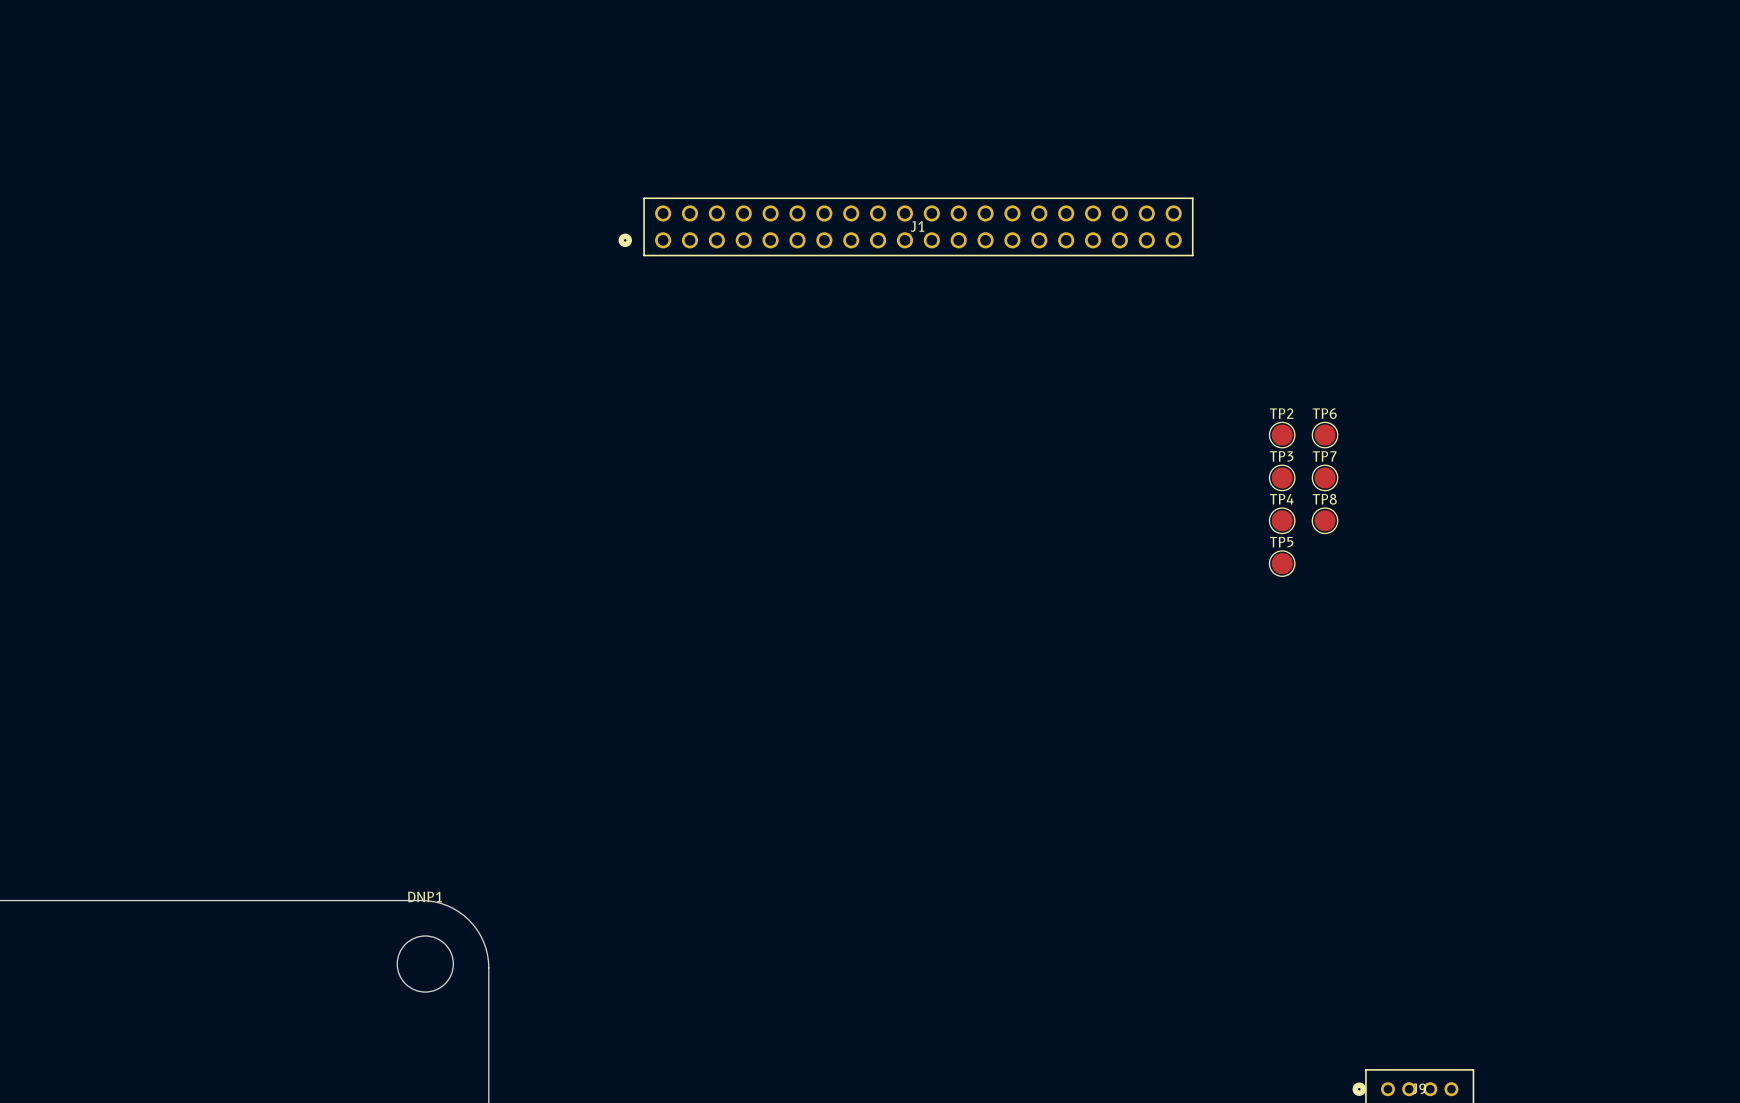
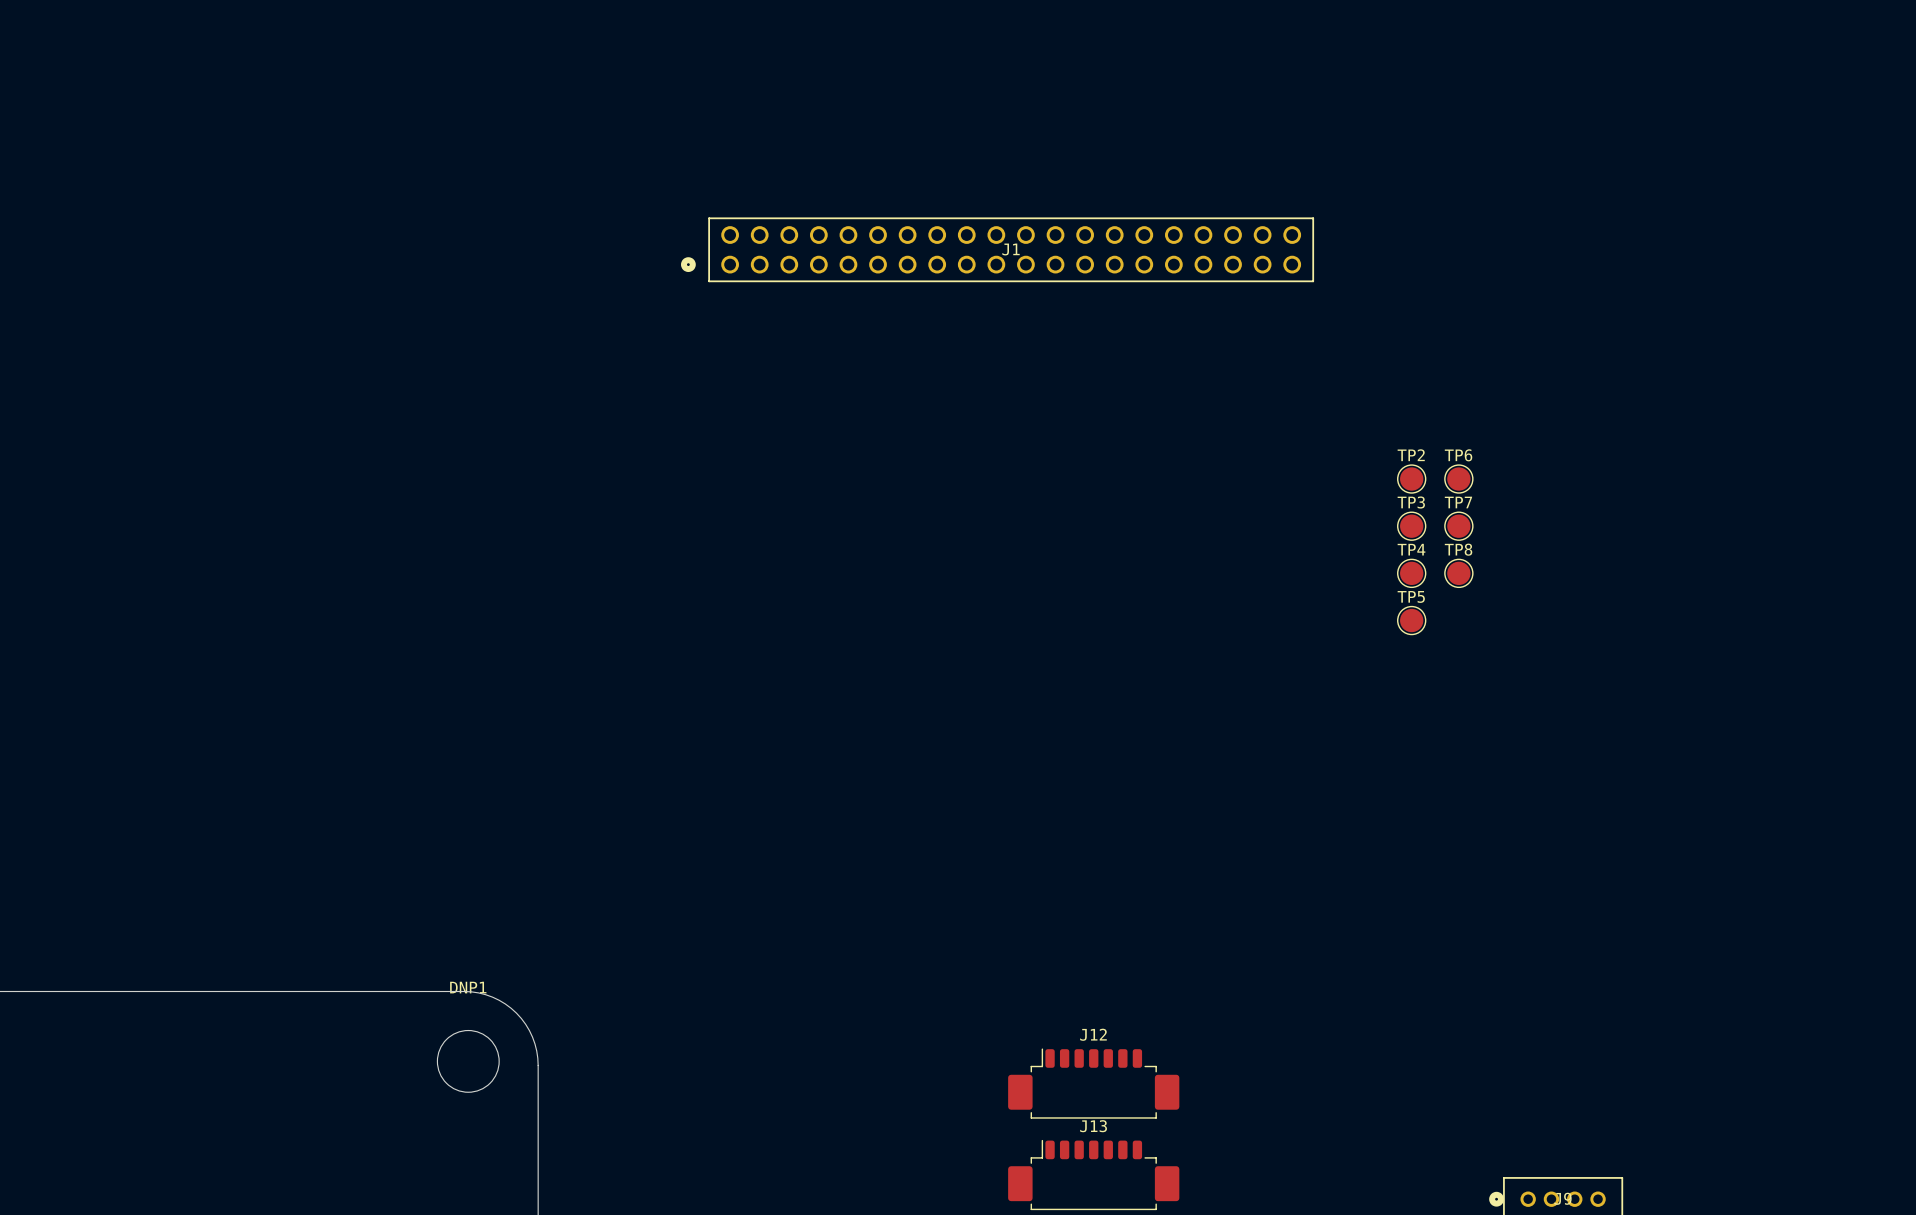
J12: none -> (1093, 1083)
J13: none -> (1093, 1175)

